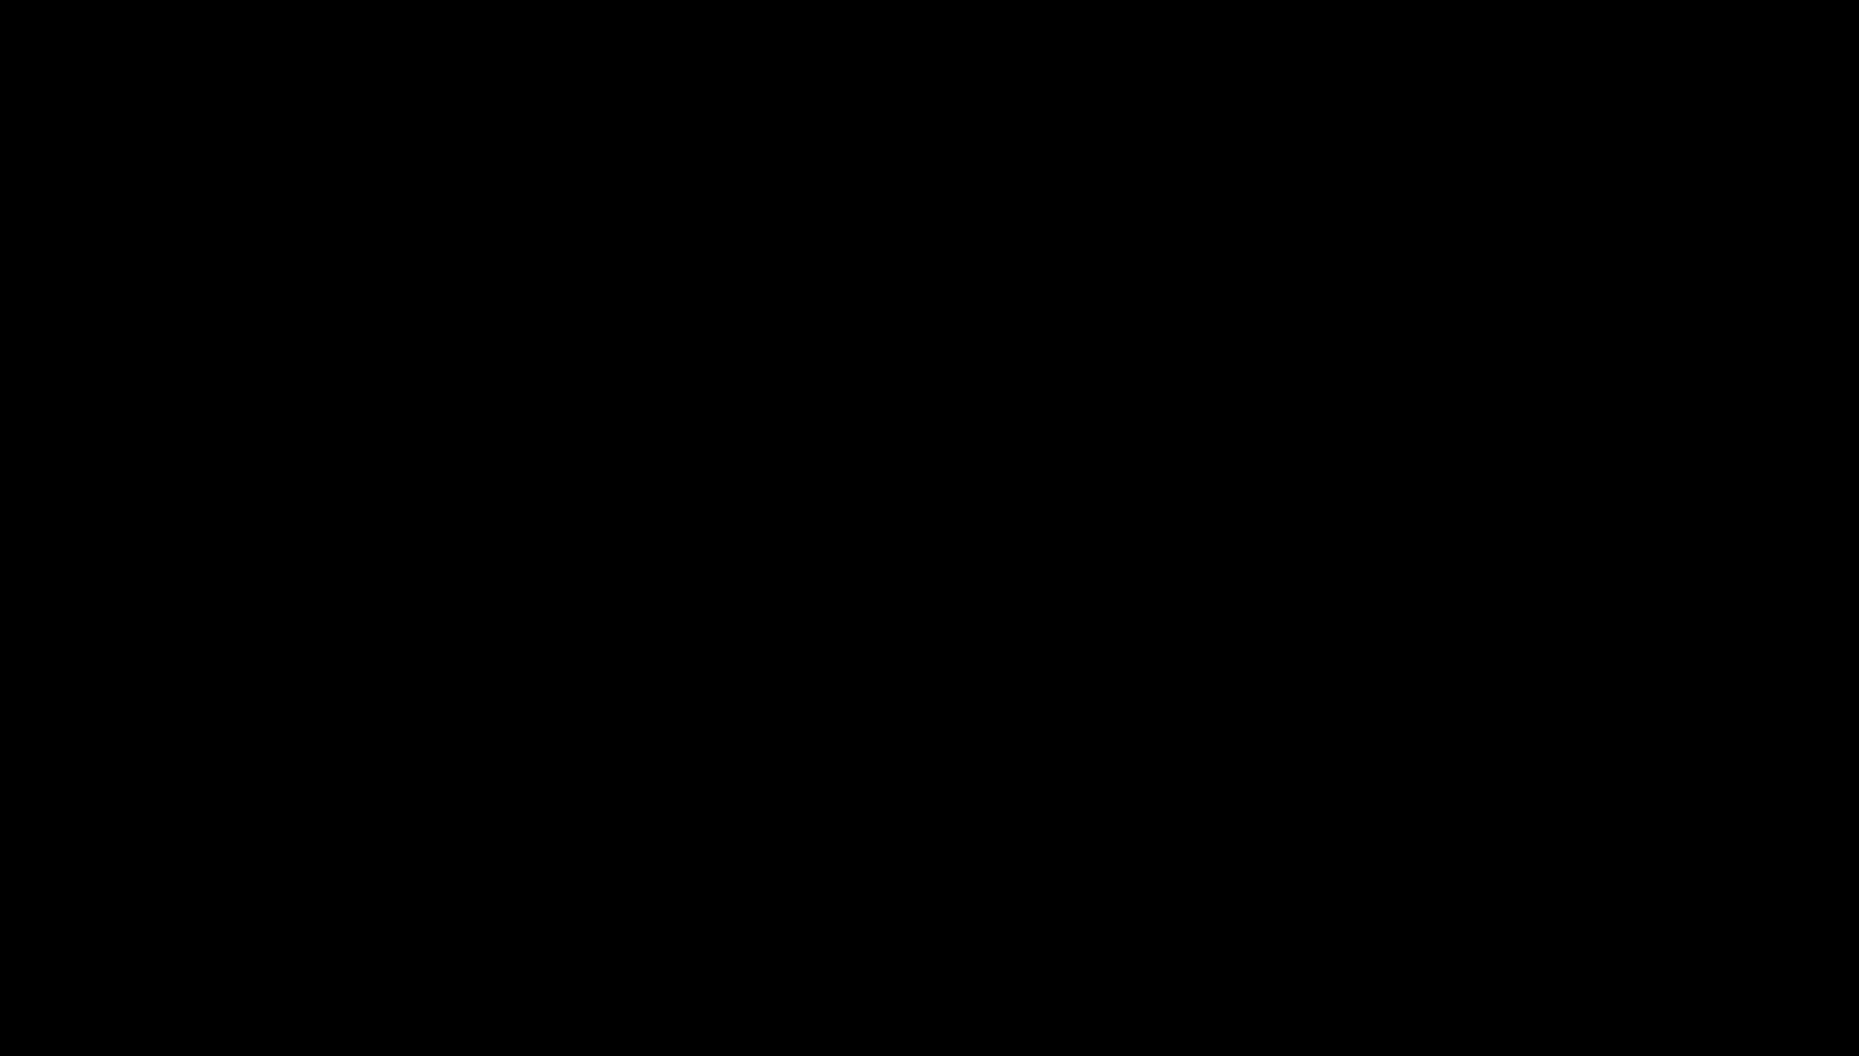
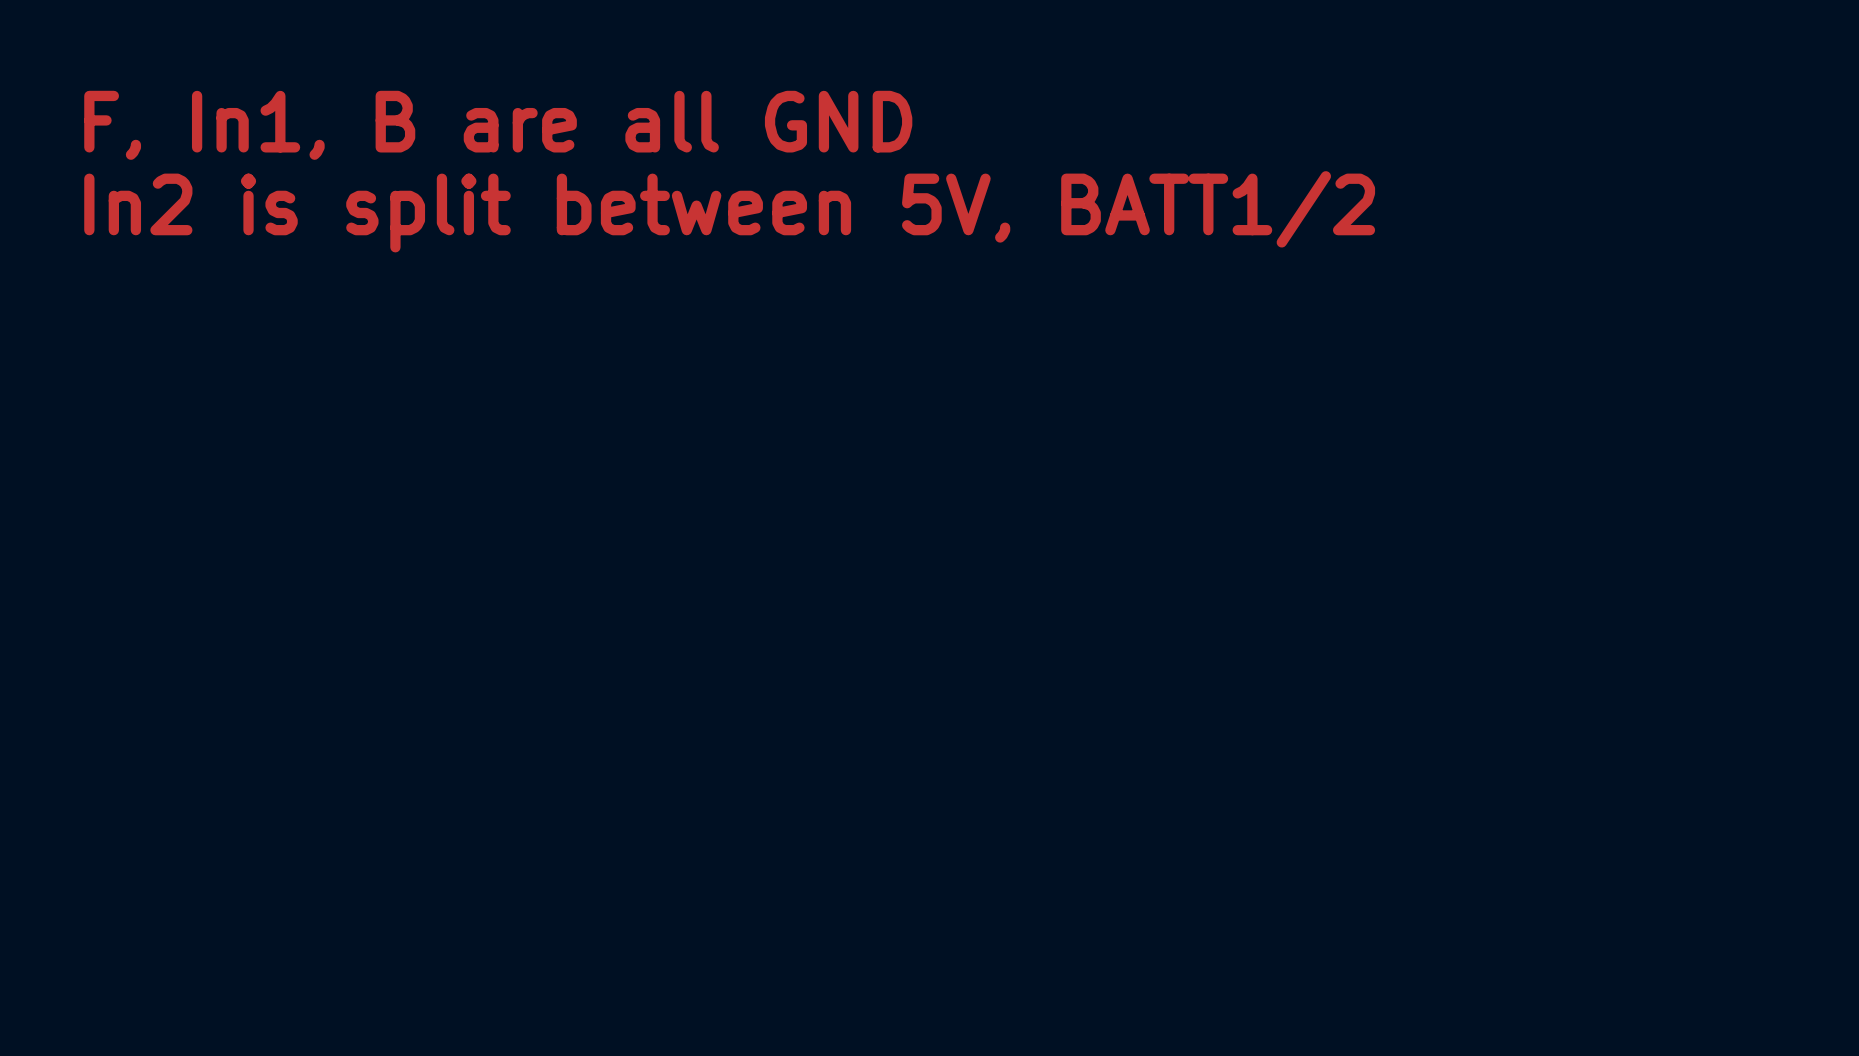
text: none -> F, In1, B are all GND (498, 125)
text: none -> In2 is split between 5V, BATT1/2 (729, 211)

